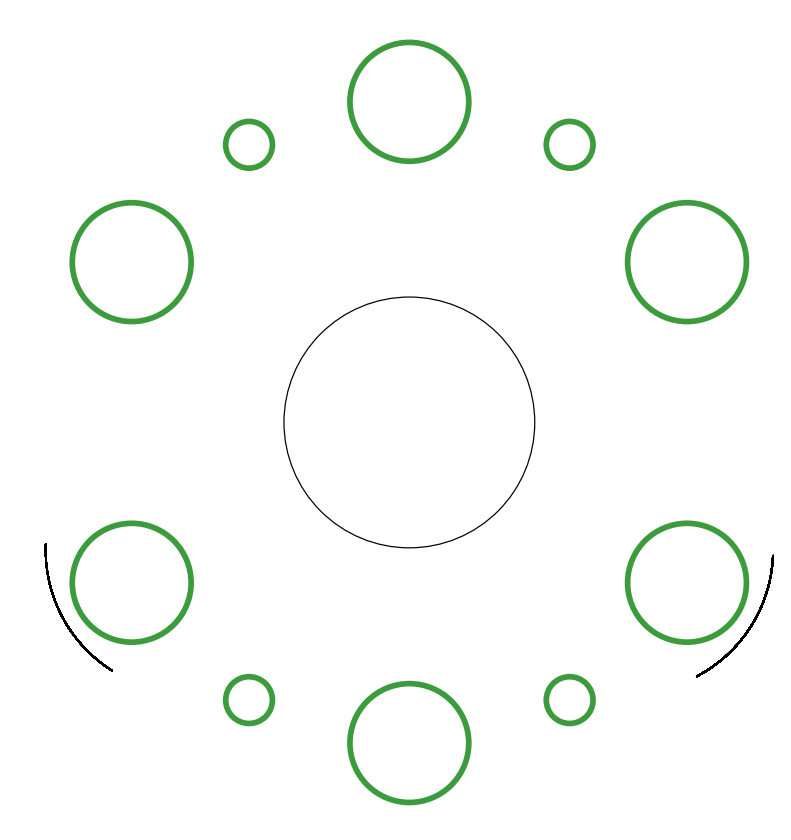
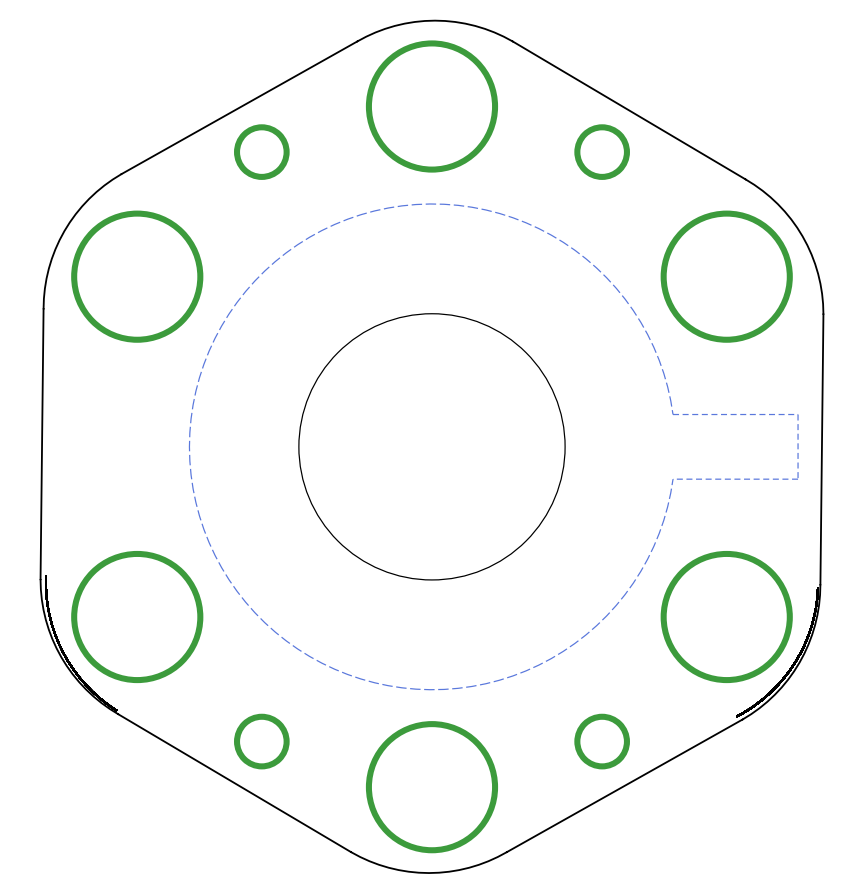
board edge: none -> (512, 41) (754, 184) (784, 211) (802, 236) (815, 264) (823, 303) (819, 605) (812, 634) (794, 671) (774, 694) (751, 714) (497, 857) (459, 870) (439, 872) (408, 871) (378, 864) (351, 852) (118, 714) (93, 696) (66, 665) (48, 629) (40, 589) (44, 288) (51, 258) (64, 231) (82, 206) (104, 185) (366, 36) (404, 23) (445, 20) (485, 28) (512, 41)
zone outline: none -> (430, 203) (388, 208) (347, 219) (309, 237) (286, 252) (264, 270) (245, 291) (228, 314) (209, 351) (199, 377) (193, 404) (189, 446) (193, 488) (199, 516) (209, 542) (228, 579) (245, 602) (264, 622) (297, 649) (334, 669) (360, 679) (388, 685) (430, 689) (472, 686) (512, 675) (551, 658) (586, 634) (616, 605) (640, 571) (659, 533) (667, 506) (673, 479) (798, 479) (798, 414) (673, 414) (663, 373) (647, 334) (625, 299) (596, 268) (563, 242) (525, 222) (499, 213) (472, 207) (430, 203)

